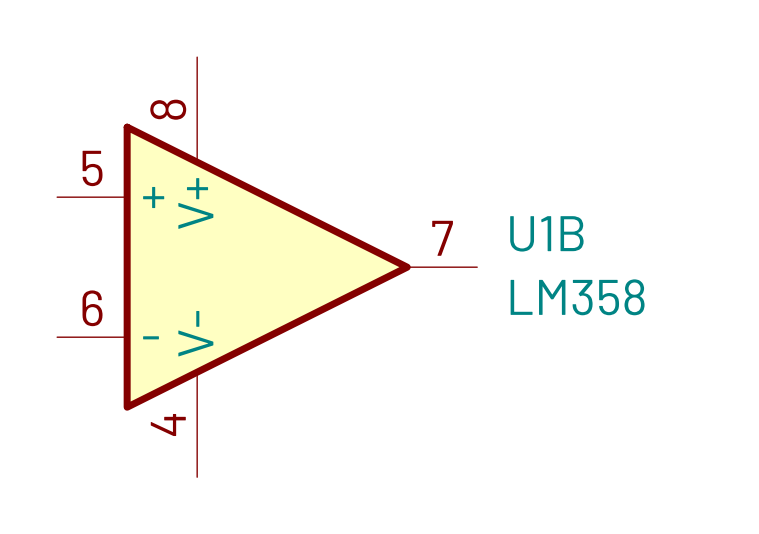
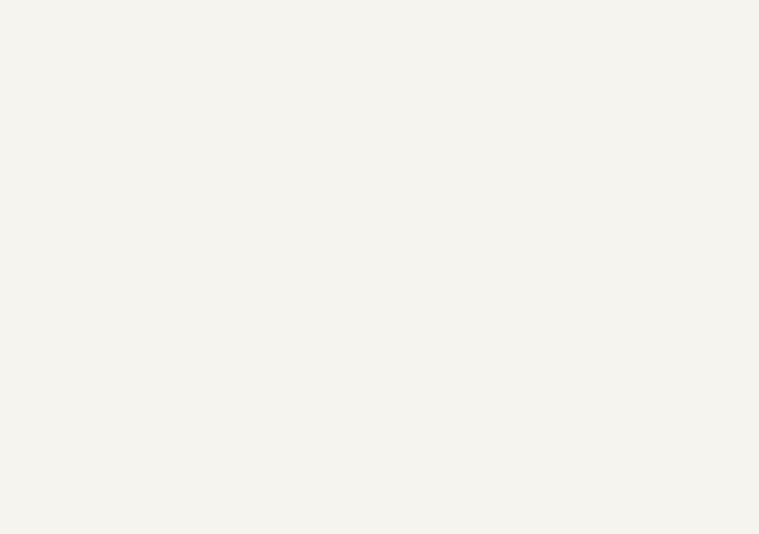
U1B: LM358 (267, 267) -> none

